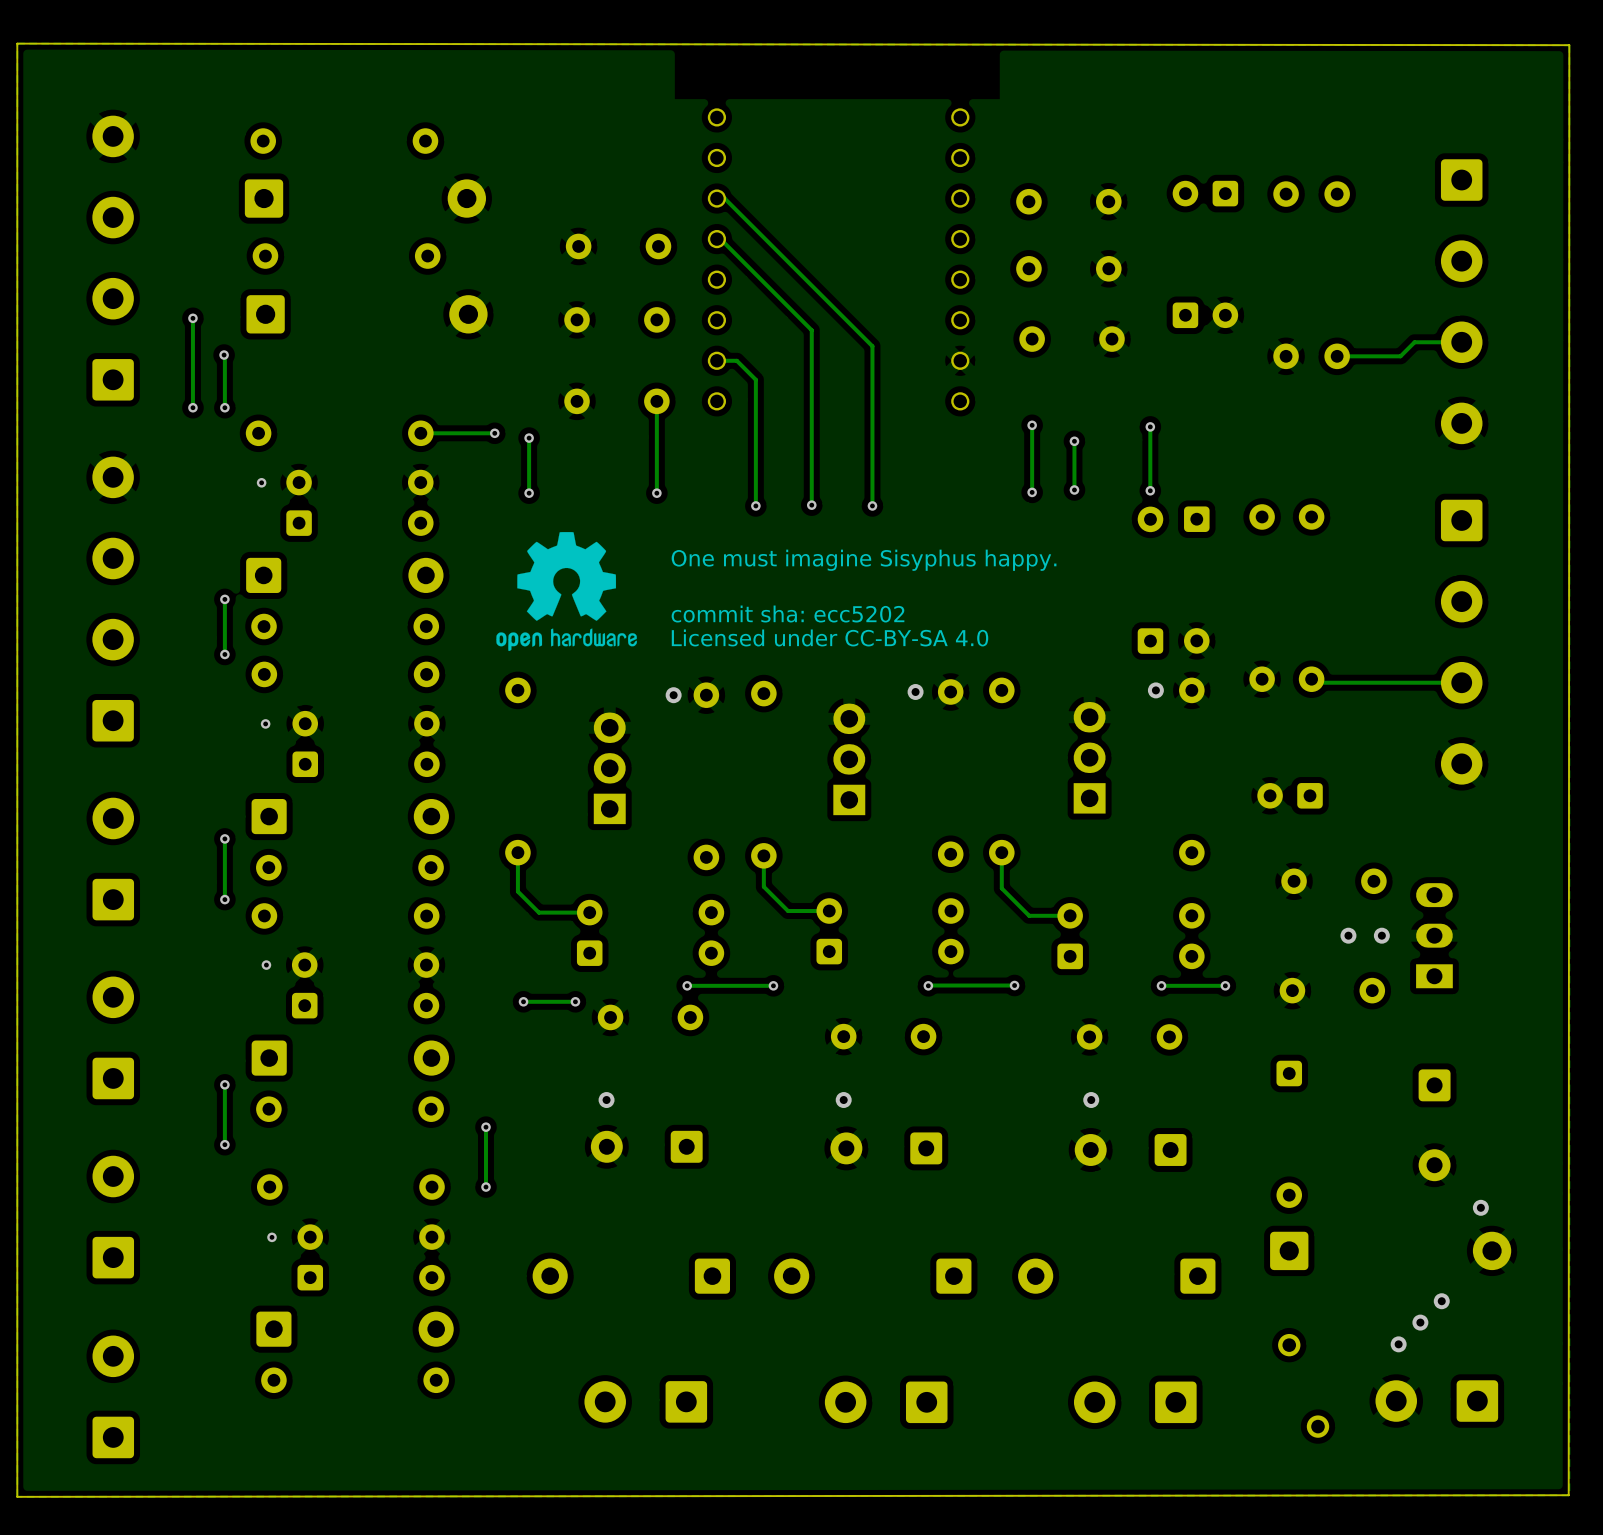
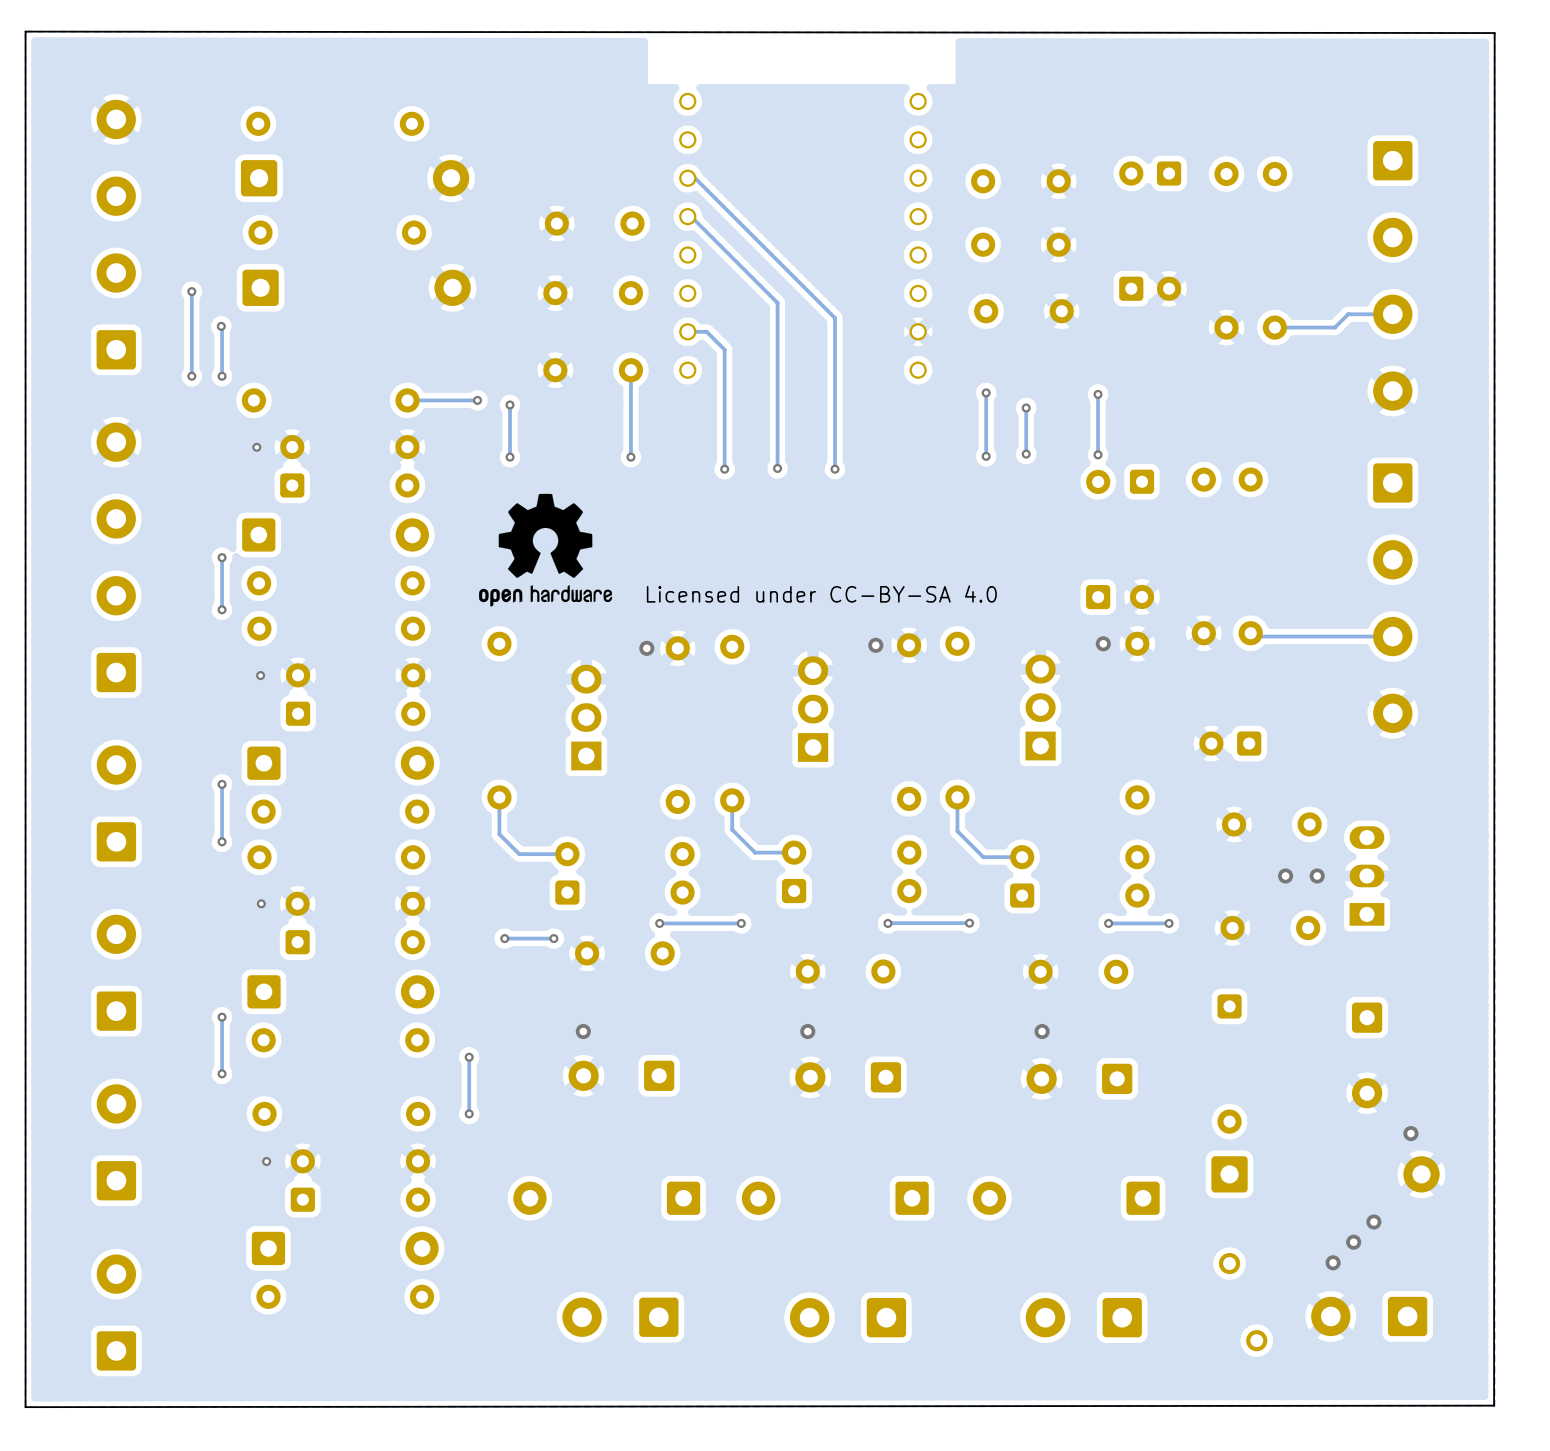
text: One must imagine Sisyphus happy. (864, 560) -> none
text: commit sha: ecc5202 (788, 614) -> none

